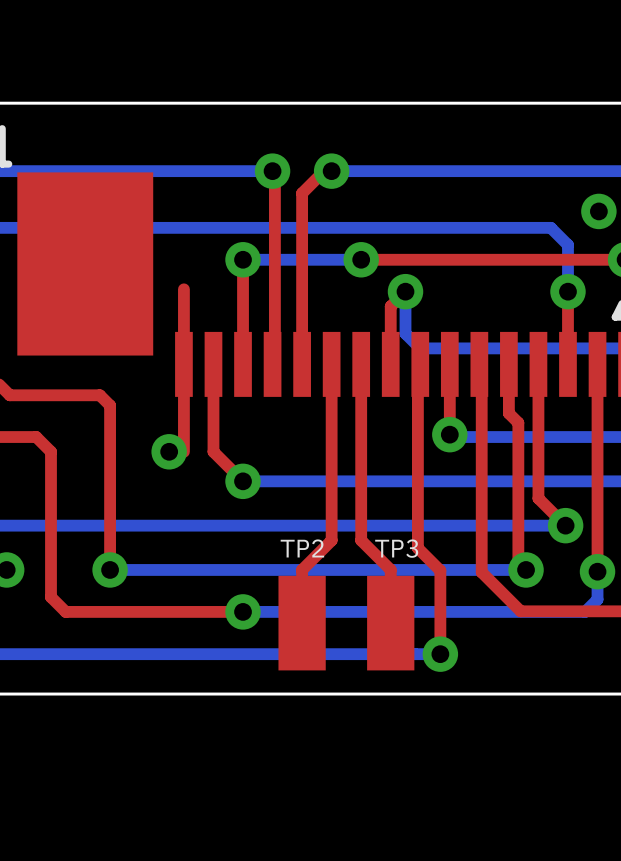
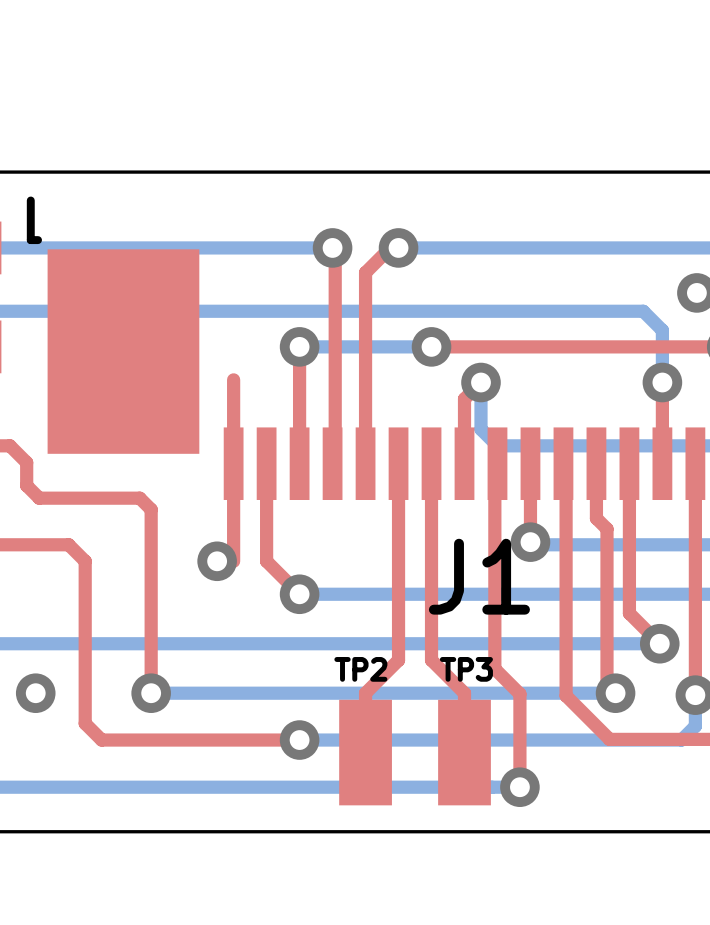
J1 name: none -> J1 (479, 576)

